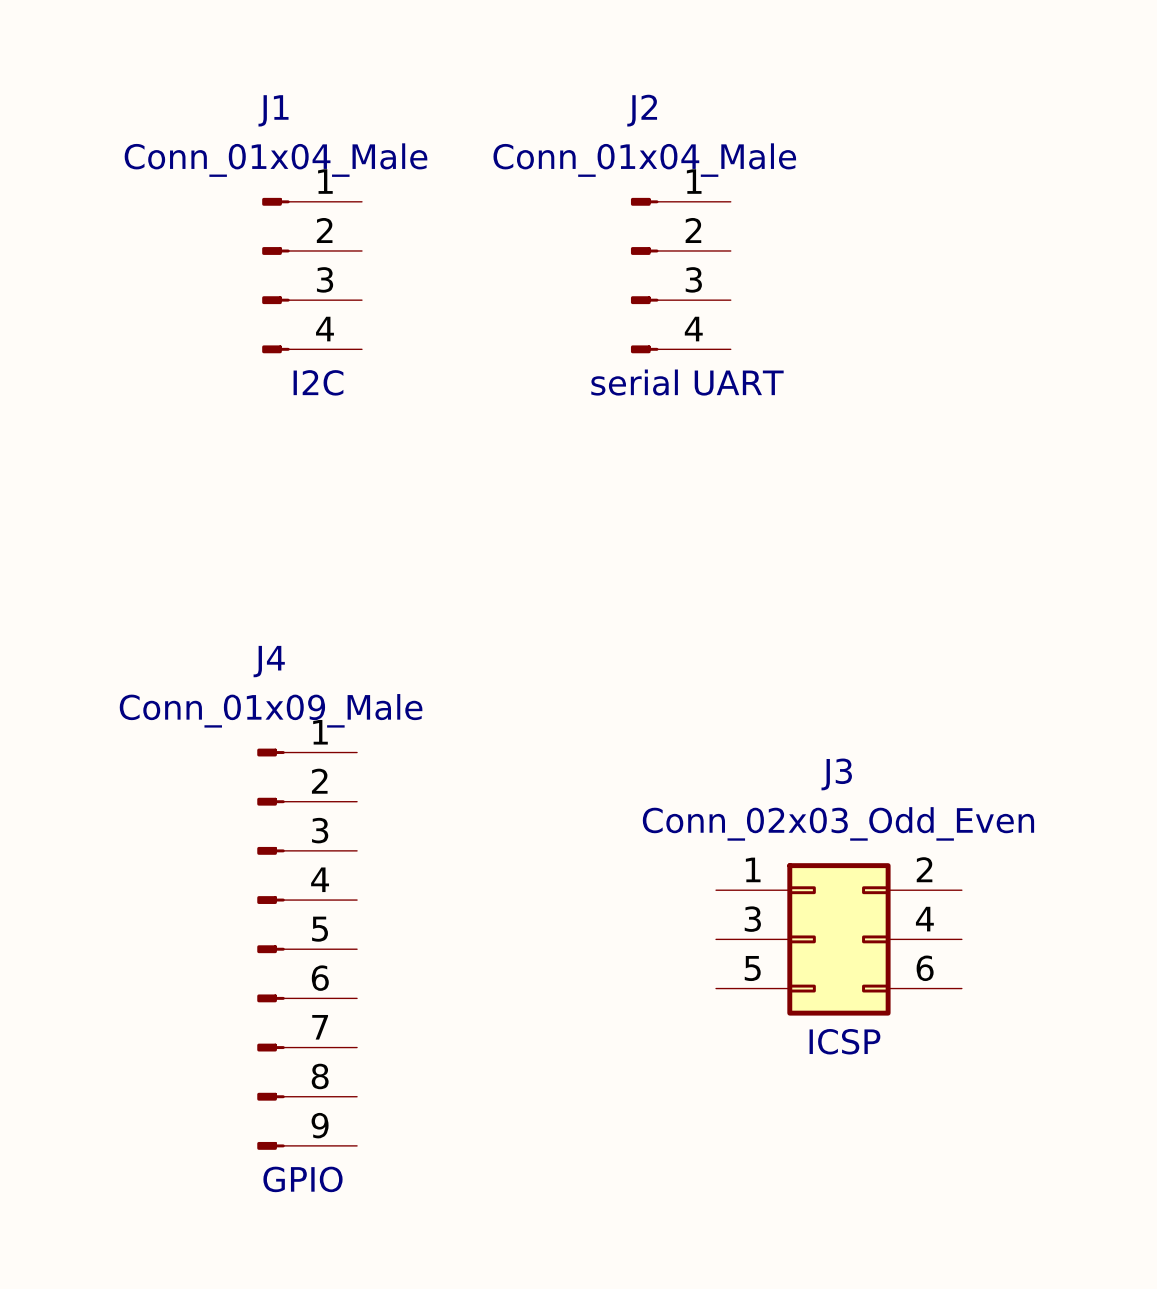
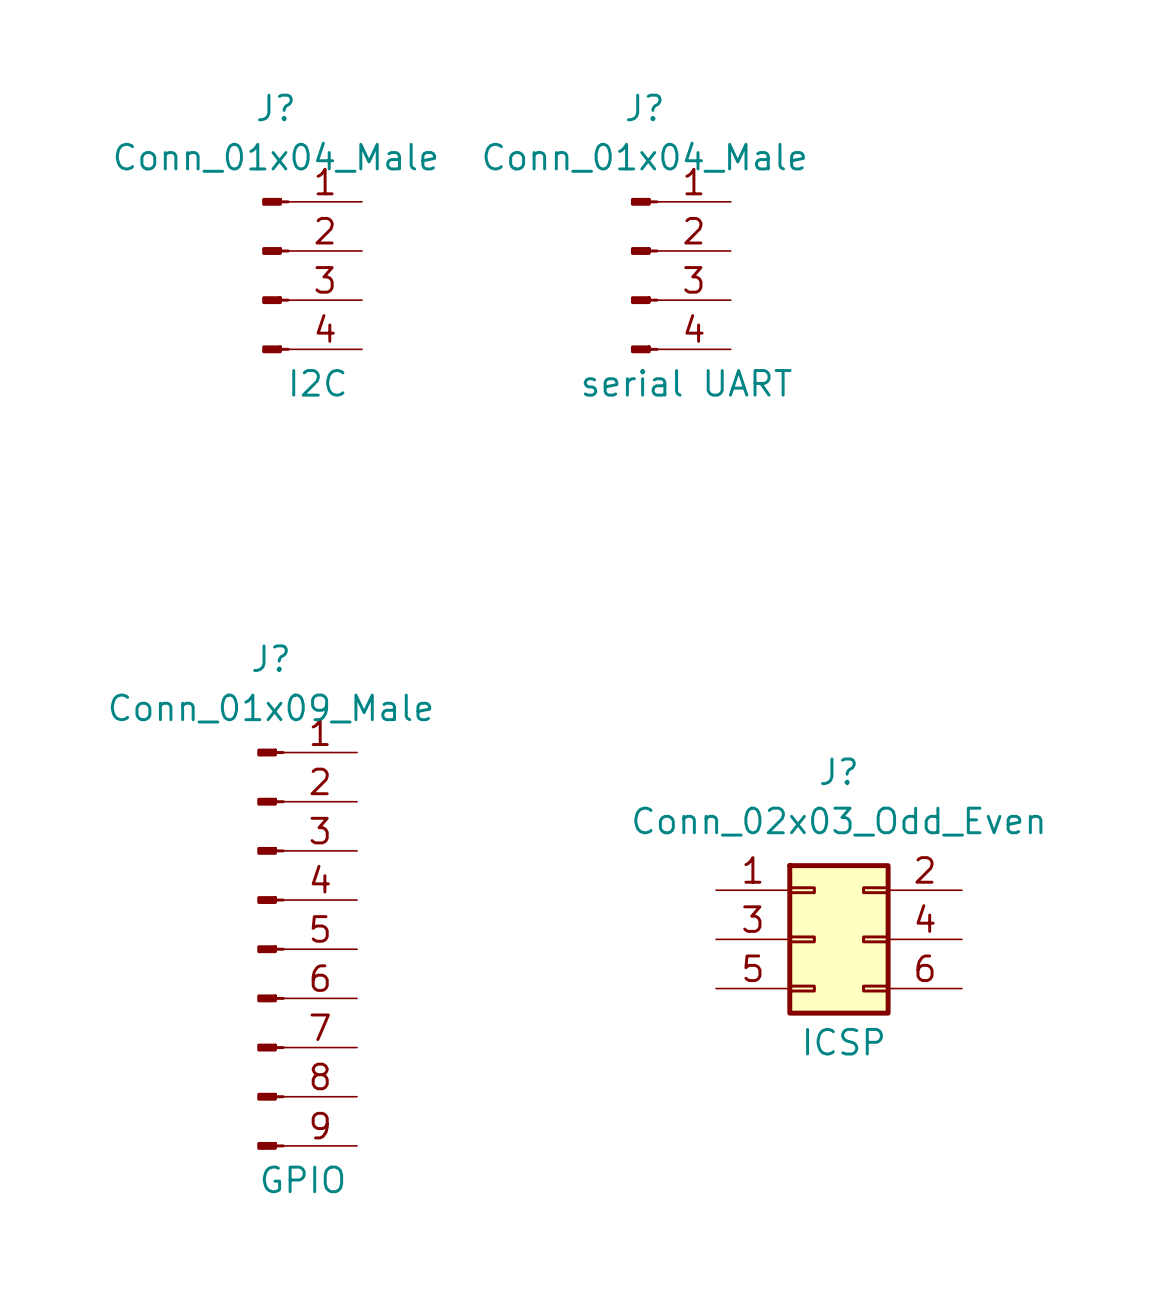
J1 name: J1 (273, 110) -> J? (275, 107)
J2 name: J2 (642, 110) -> J? (644, 107)
J4 name: J4 (269, 661) -> J? (270, 658)
J3 name: J3 (836, 774) -> J? (838, 771)

